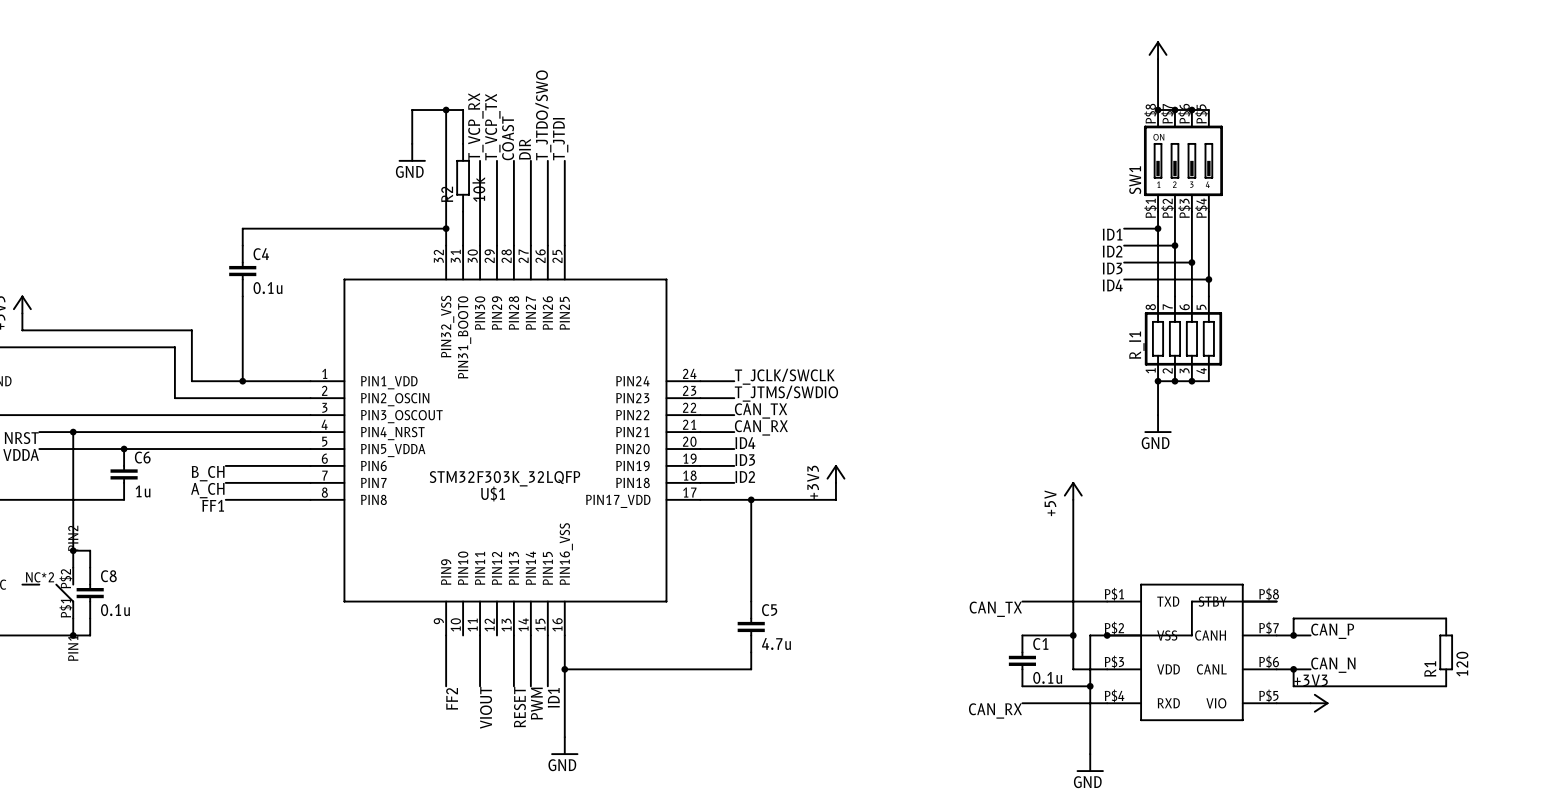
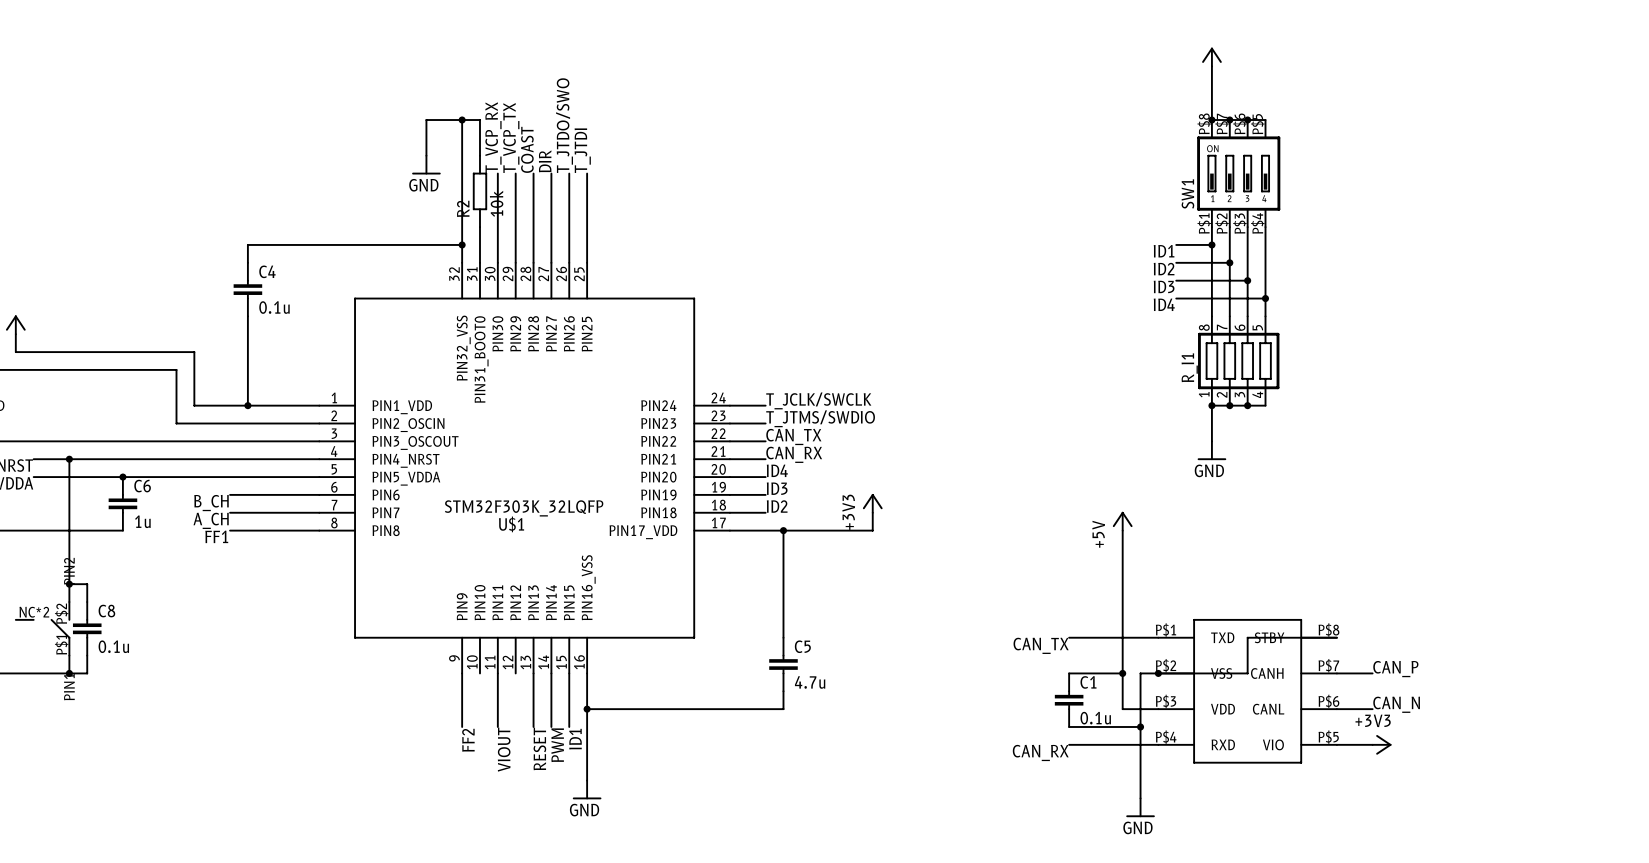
wire: (1446, 618) (1293, 618) (1293, 635) -> none
junction: (1293, 635) -> none
R1: 120 (1446, 652) -> none
wire: (1293, 669) (1293, 686) (1446, 686) -> none
junction: (1293, 669) -> none

